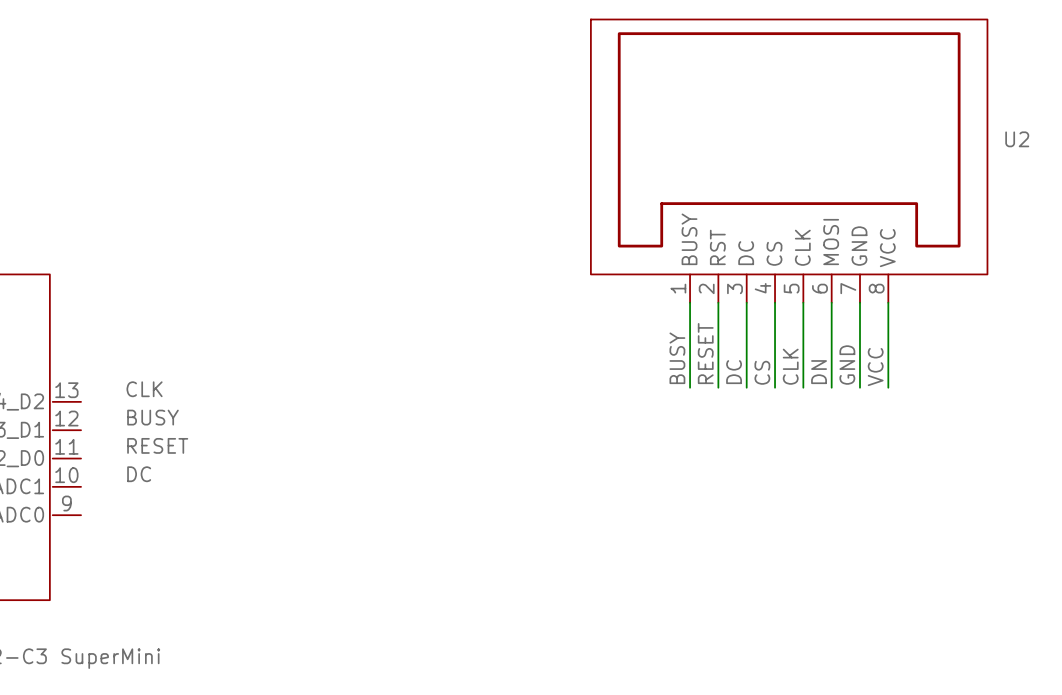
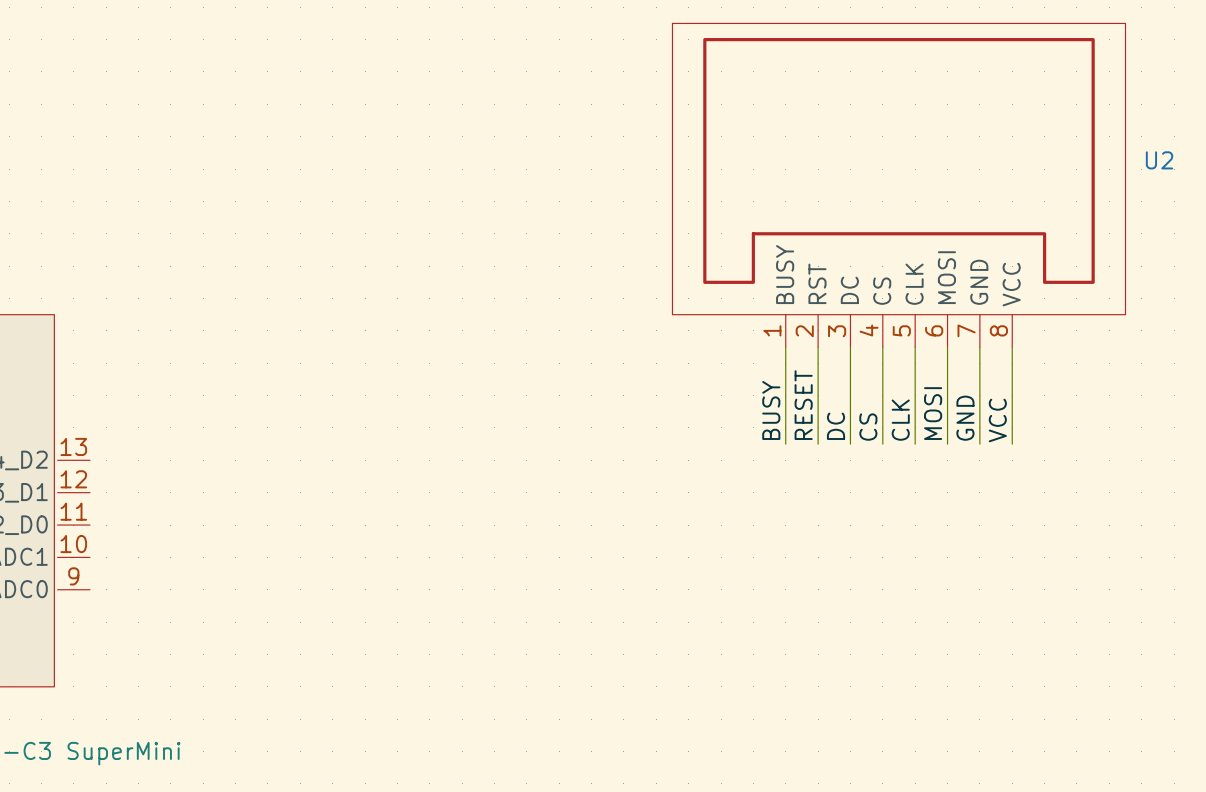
label: DN (819, 372) -> MOSI (933, 413)
label: CLK (144, 389) -> none
label: BUSY (152, 417) -> none
label: RESET (157, 445) -> none
label: DC (139, 474) -> none

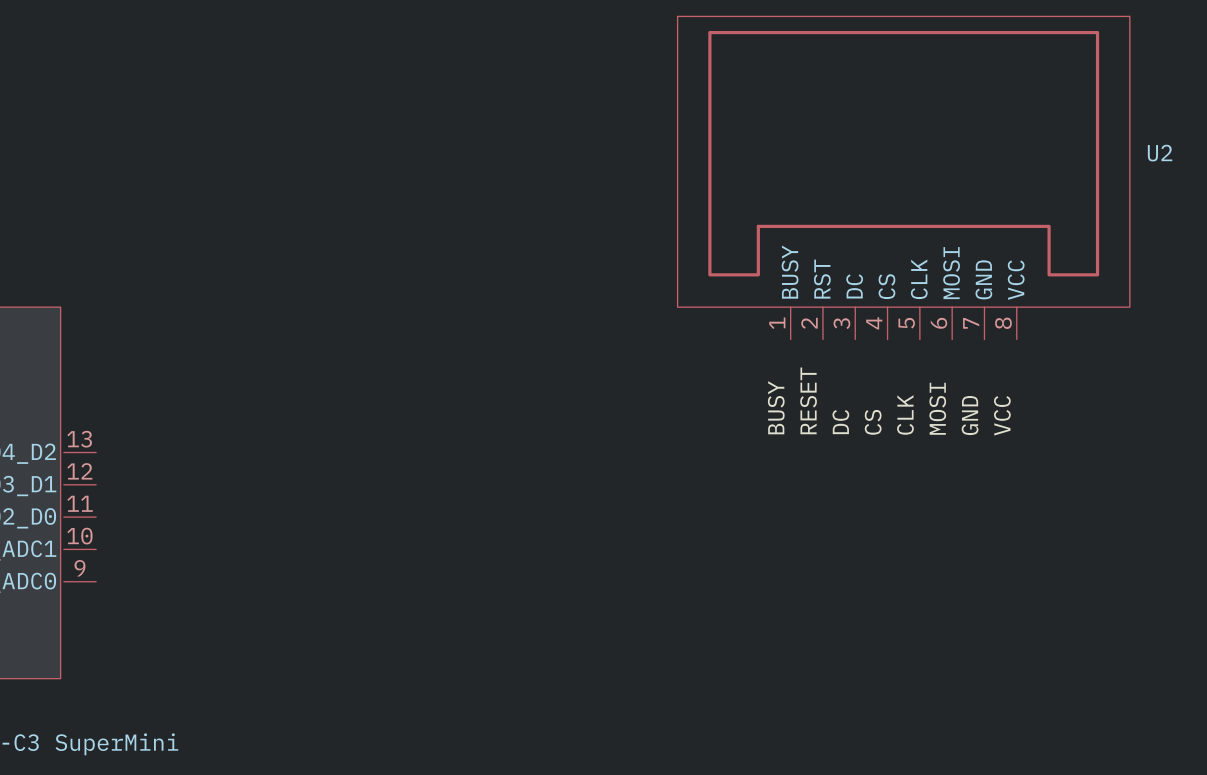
wire: (785, 347) (785, 444) -> none
wire: (818, 347) (818, 444) -> none
wire: (850, 347) (850, 444) -> none
wire: (882, 347) (882, 444) -> none
wire: (915, 347) (915, 444) -> none
wire: (947, 347) (947, 444) -> none
wire: (979, 347) (979, 444) -> none
wire: (1012, 347) (1012, 444) -> none

